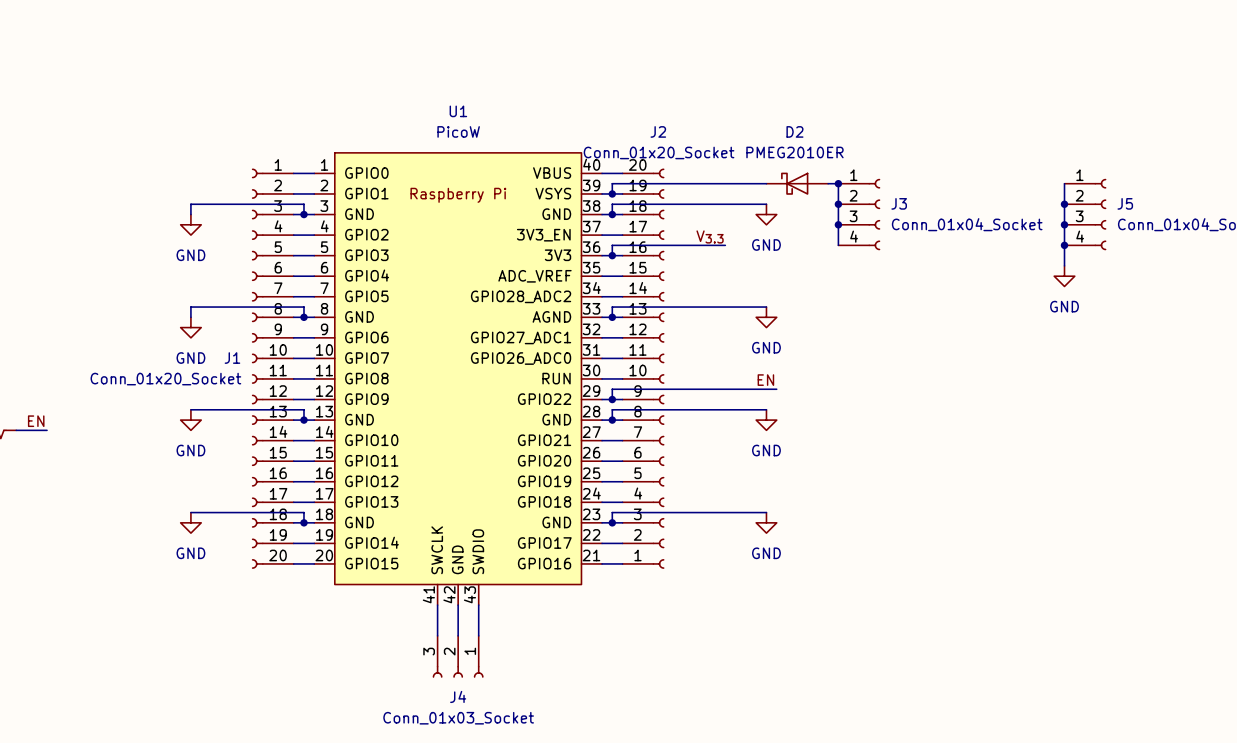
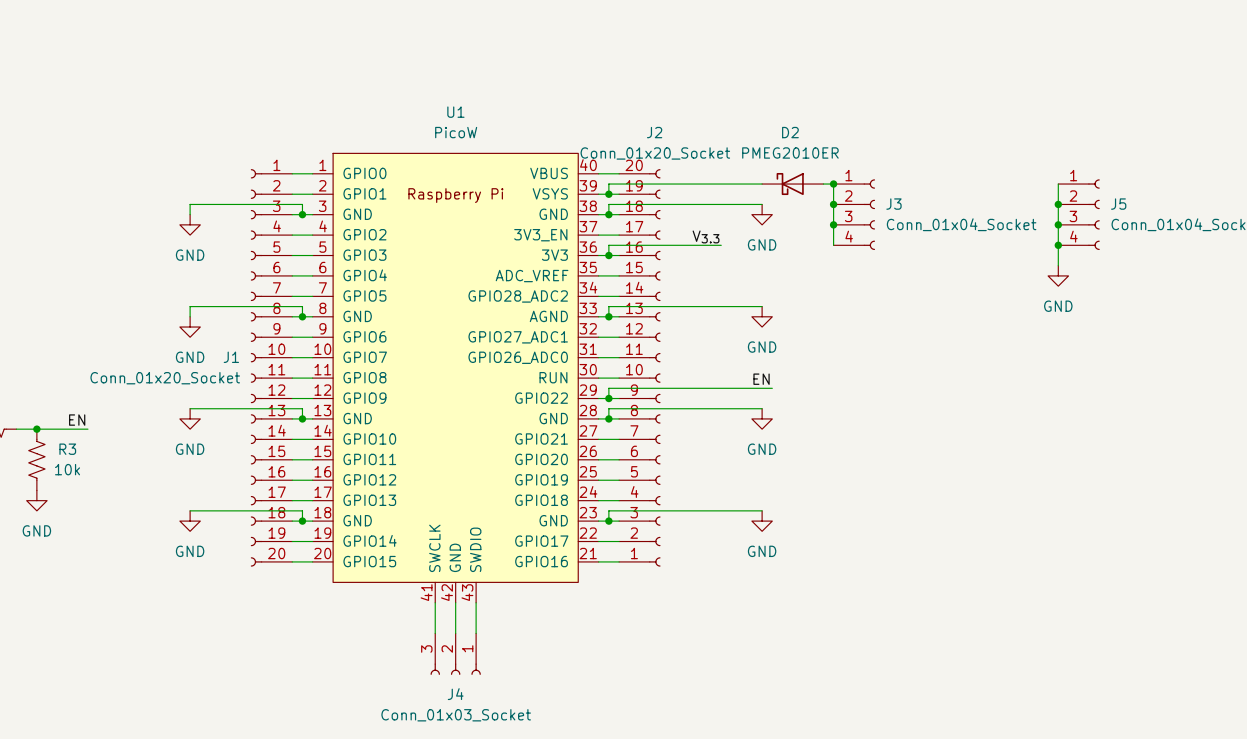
label position: EN (36, 421) -> EN (77, 420)
junction: none -> (36, 429)
wire: none -> (47, 429) (87, 429)
R3: none -> 10k (36, 459)
power symbol: none -> GND (36, 500)

